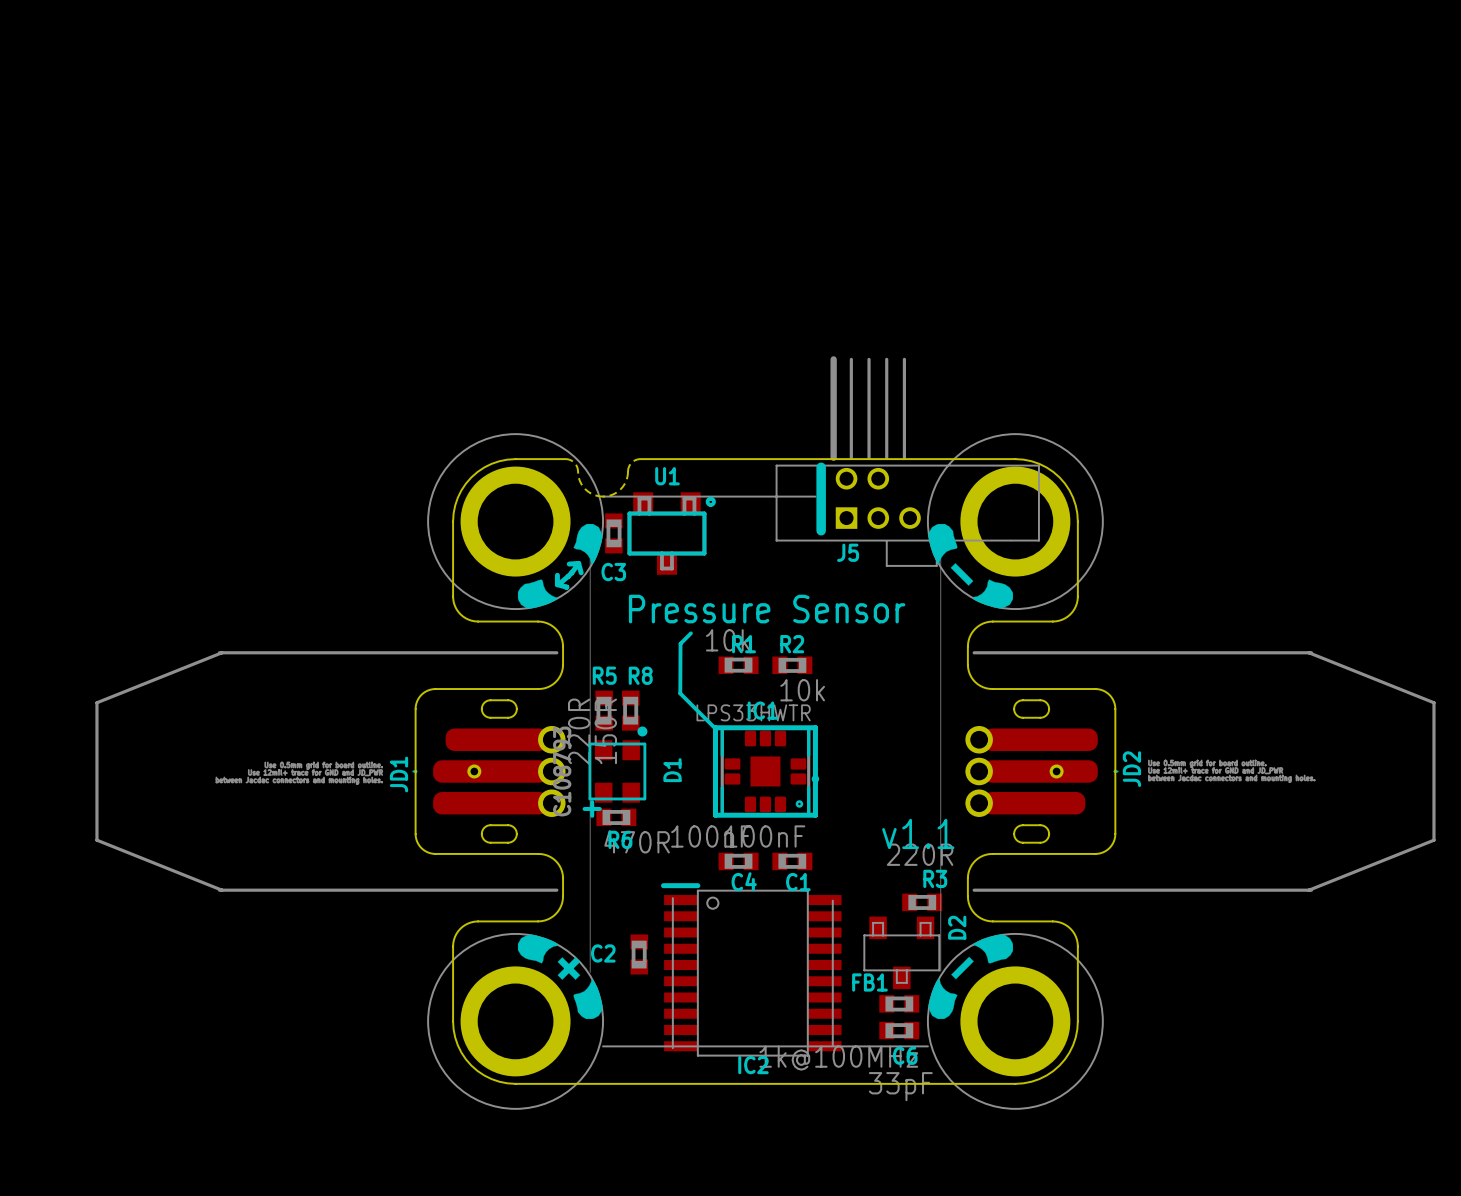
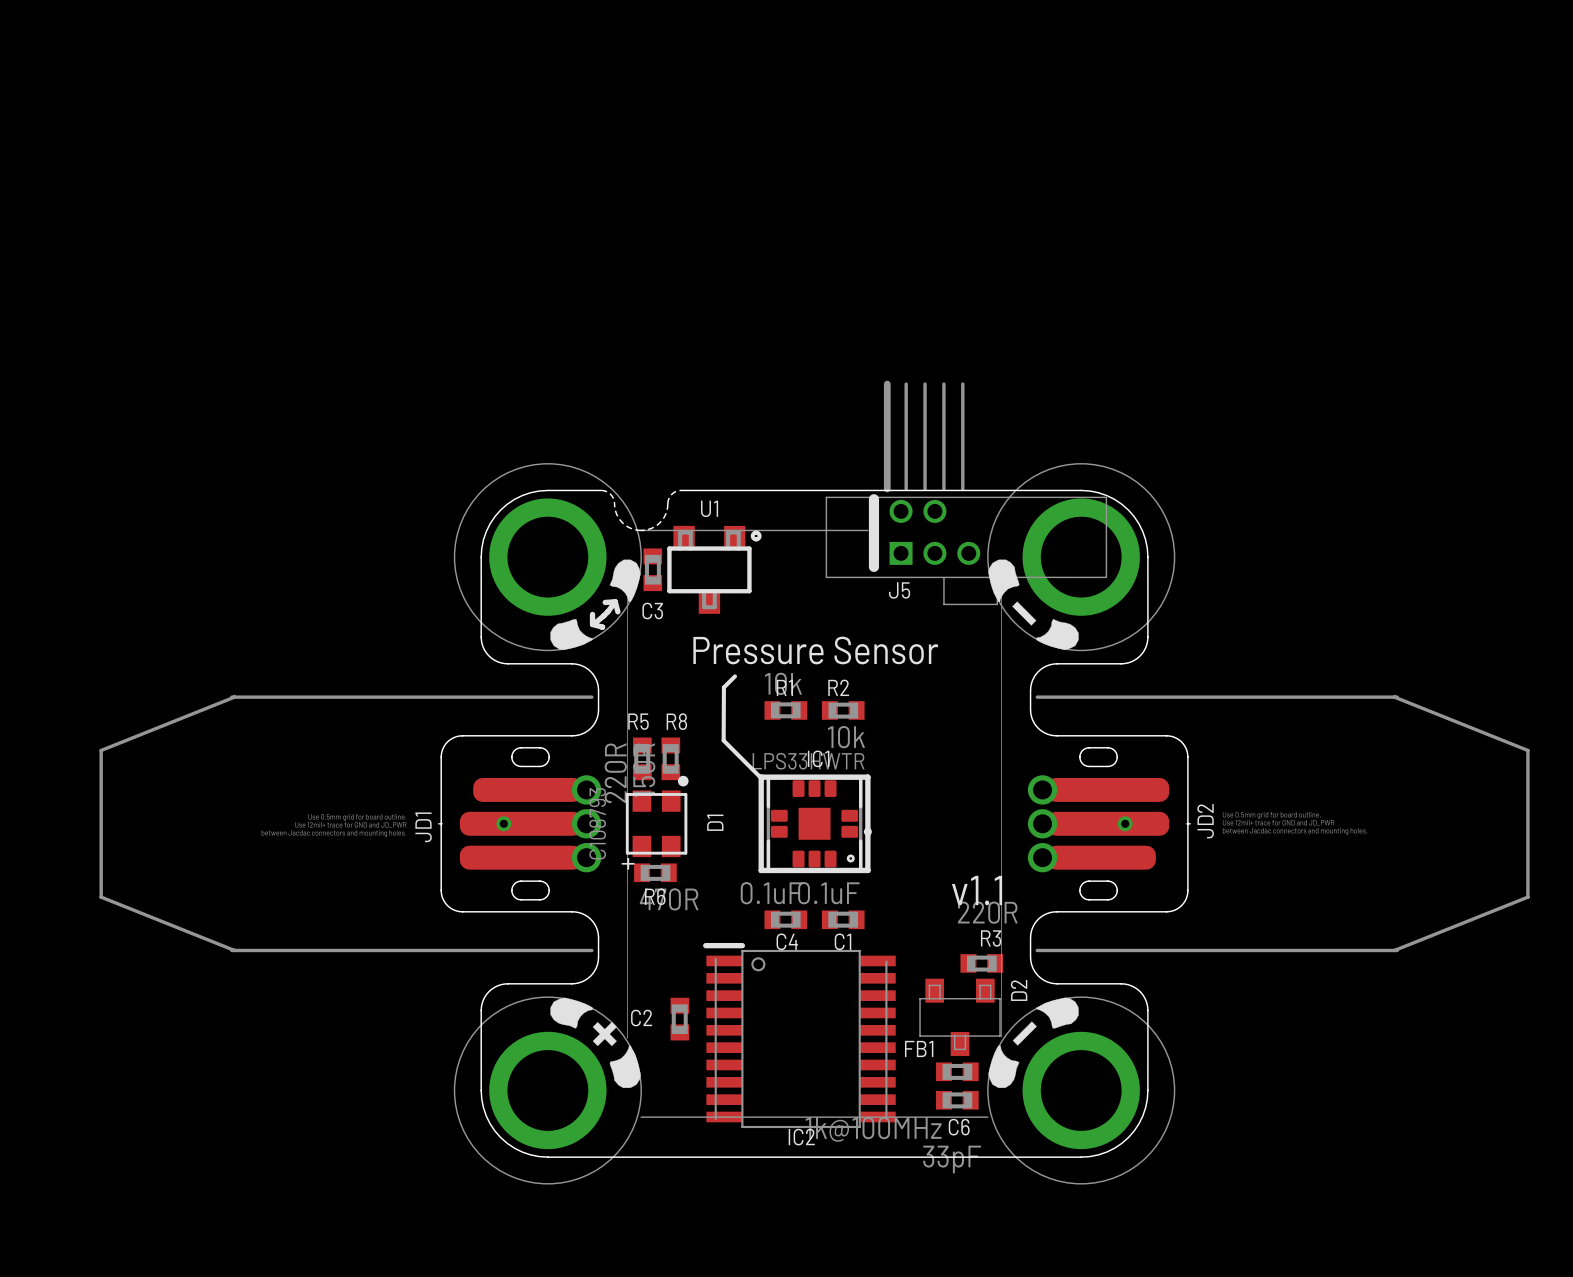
C4 value: 100nF (711, 836) -> 0.1uF (771, 893)
C1 value: 100nF (765, 836) -> 0.1uF (828, 893)

